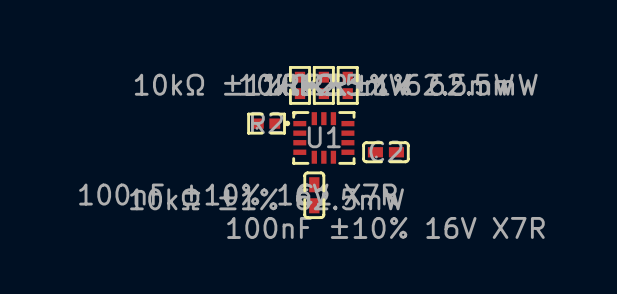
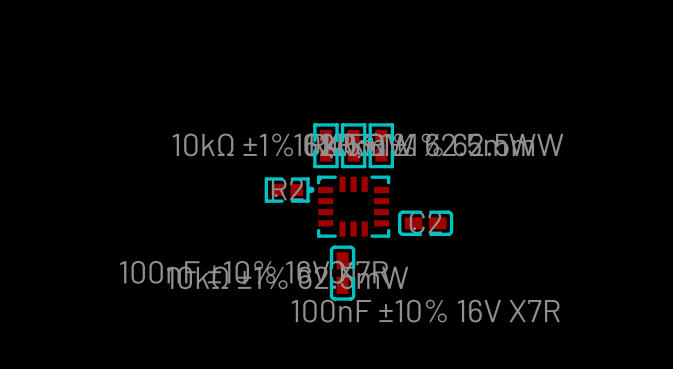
U1 name: U1 (324, 137) -> none

